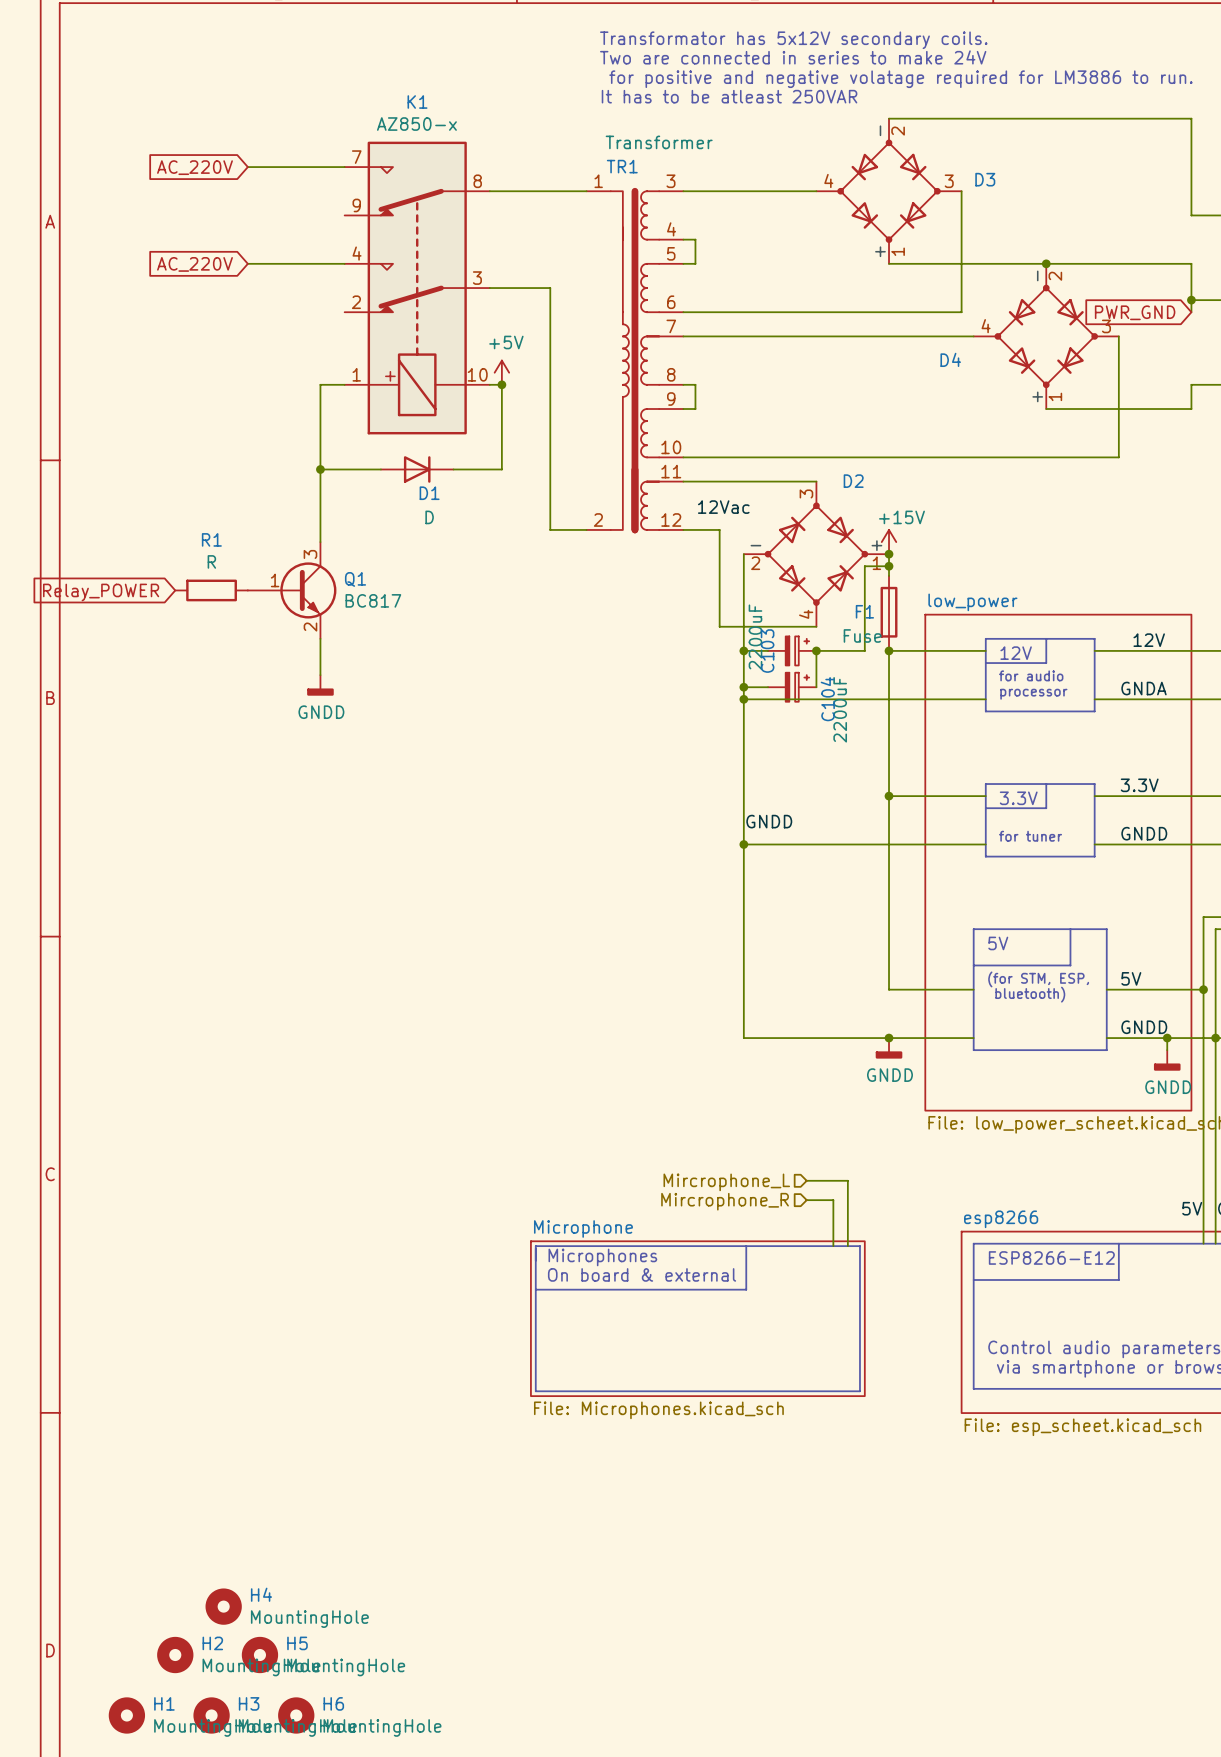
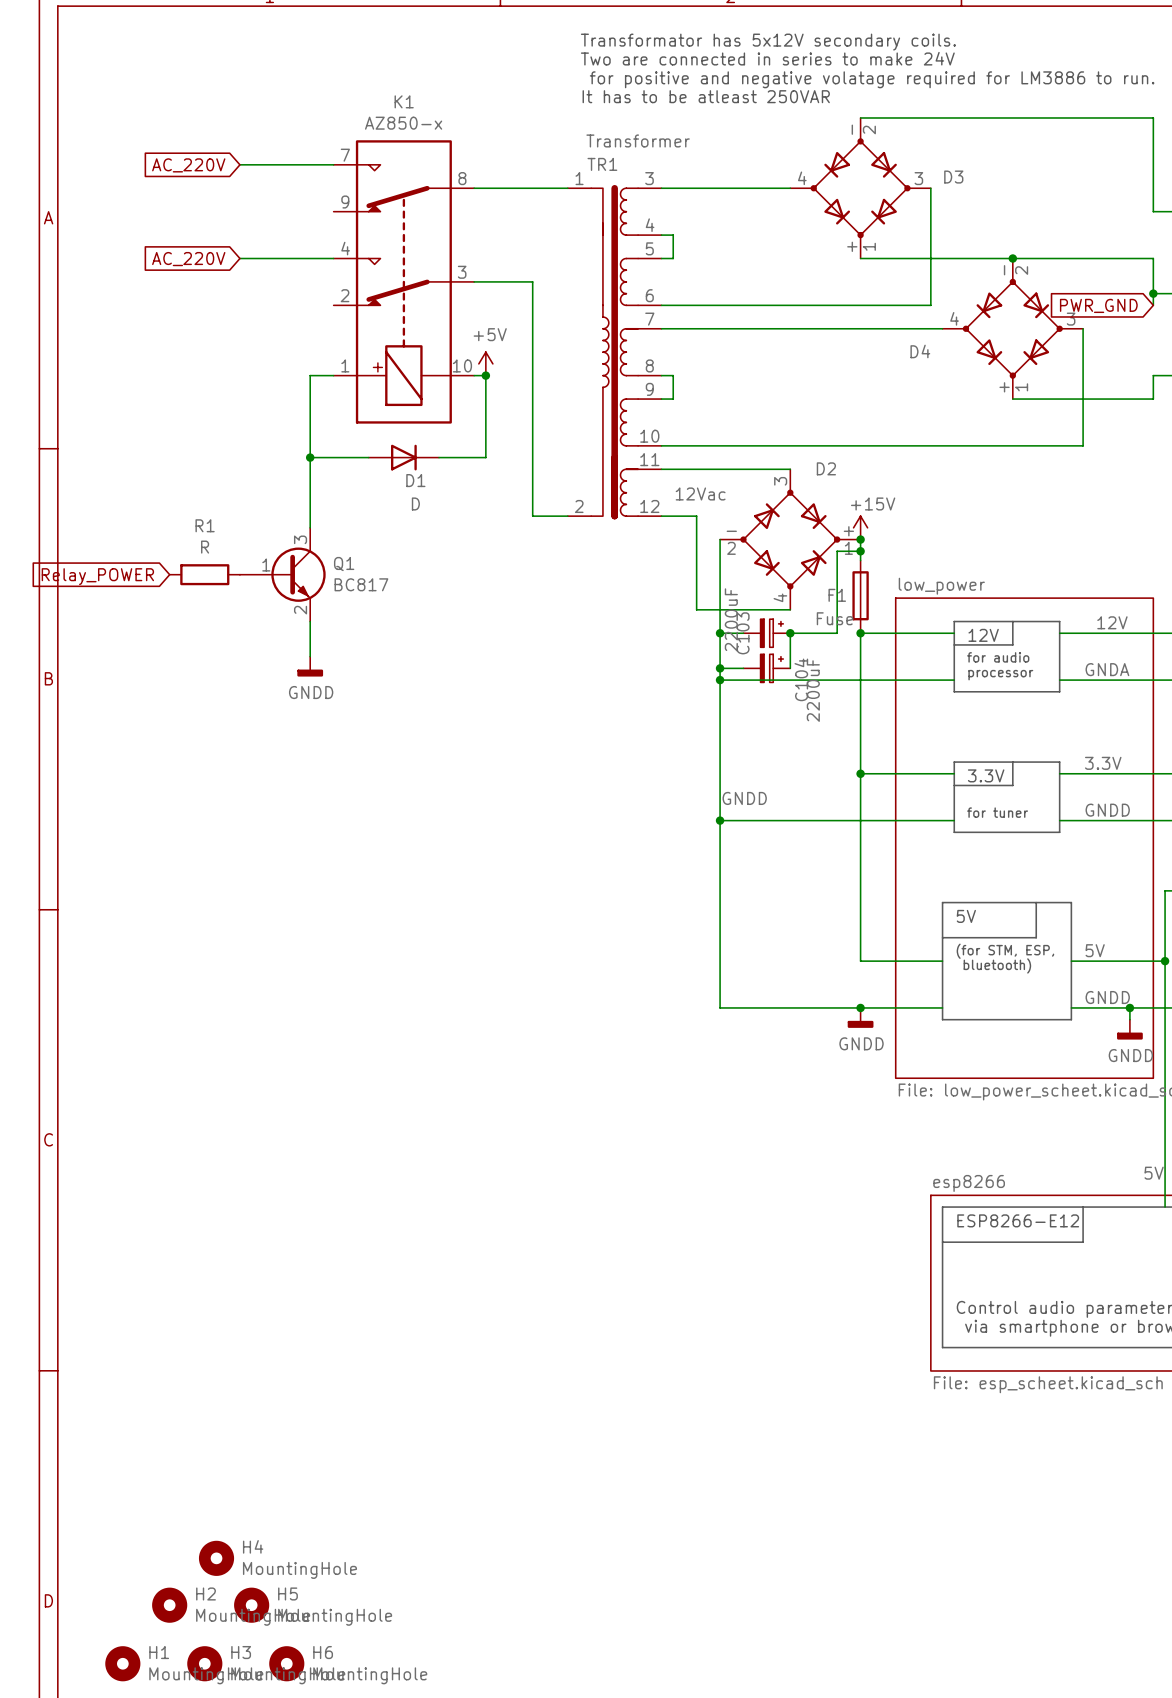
wire: (806, 1180) (847, 1180) (847, 1246) -> none
hierarchical label: Mircrophone_L (726, 1182) -> none
wire: (806, 1200) (833, 1200) (833, 1246) -> none
hierarchical label: Mircrophone_R (725, 1201) -> none
line: (535, 1246) (535, 1391) (859, 1391) (859, 1246) (535, 1246) -> none
line: (746, 1246) (746, 1289) (535, 1289) -> none
text: Microphones (602, 1257) -> none
text: On board & external (642, 1274) -> none
sheet Microphone: File: Microphones.kicad_sch (697, 1318) -> none

